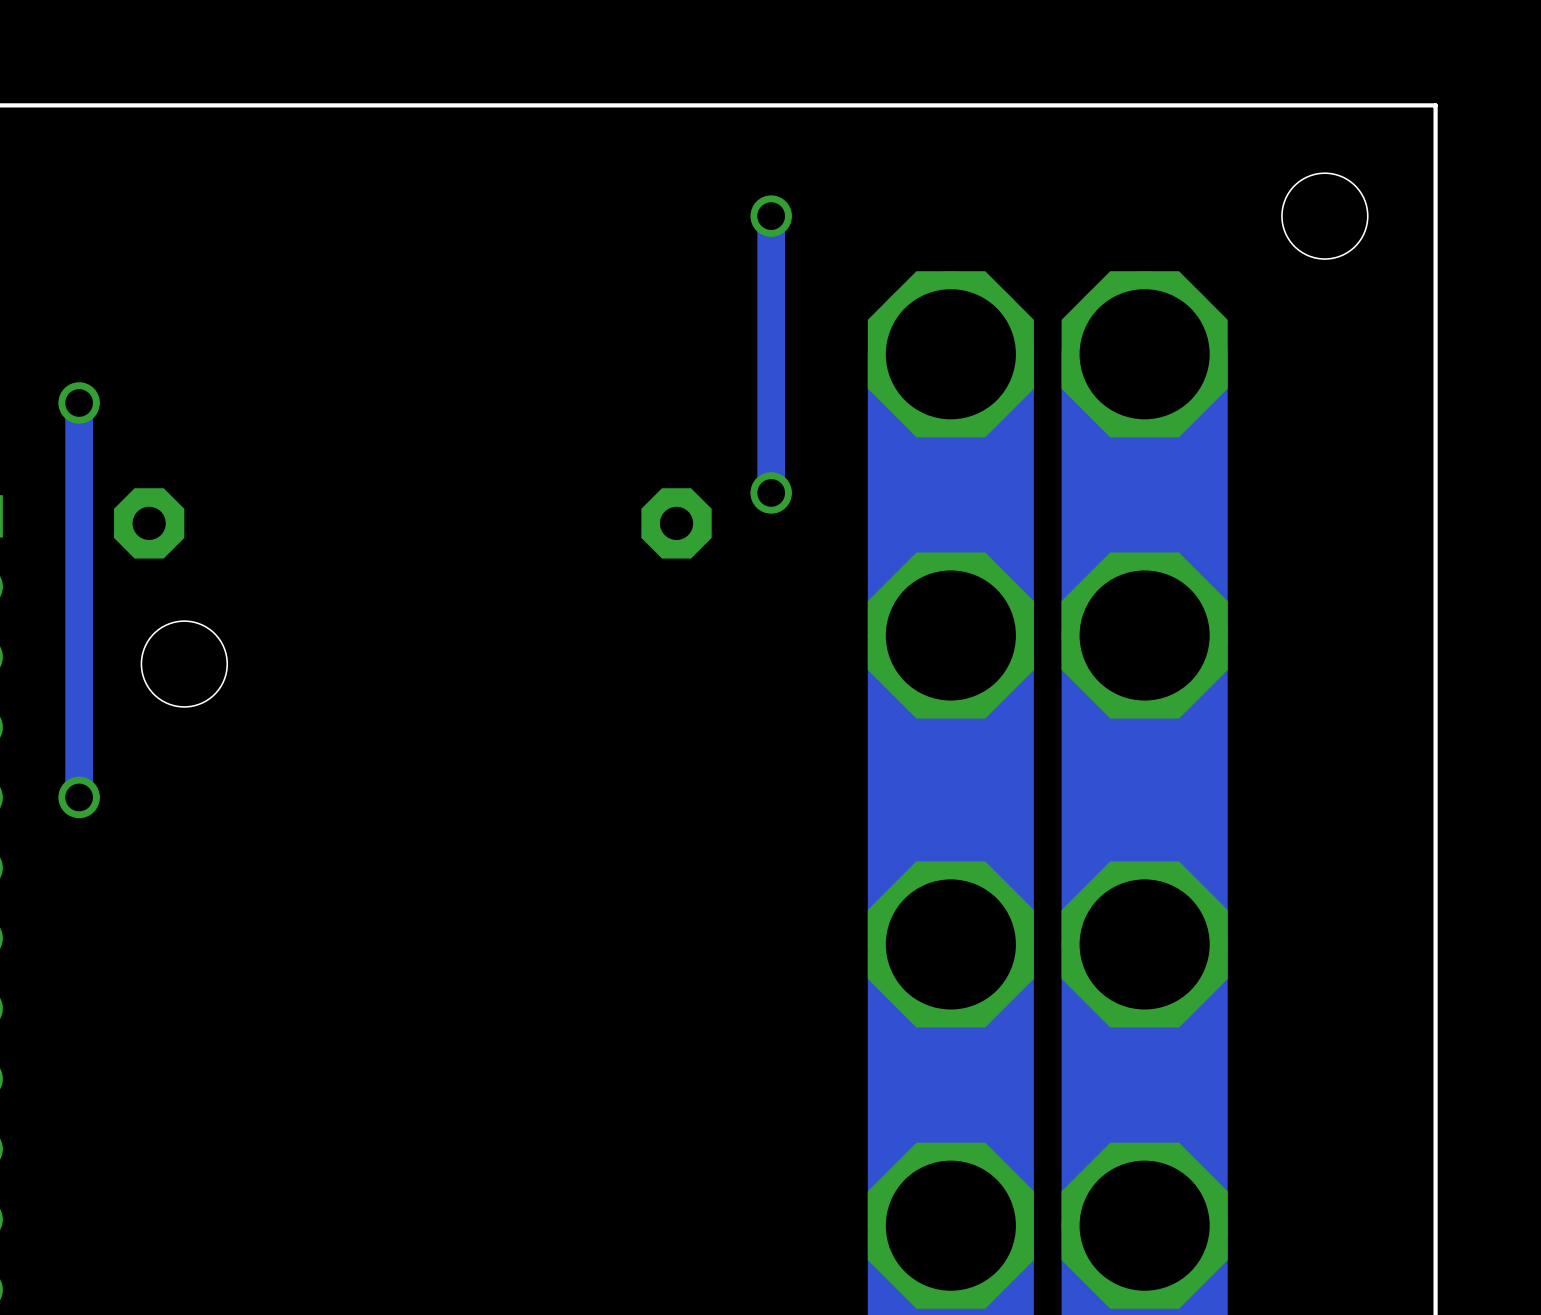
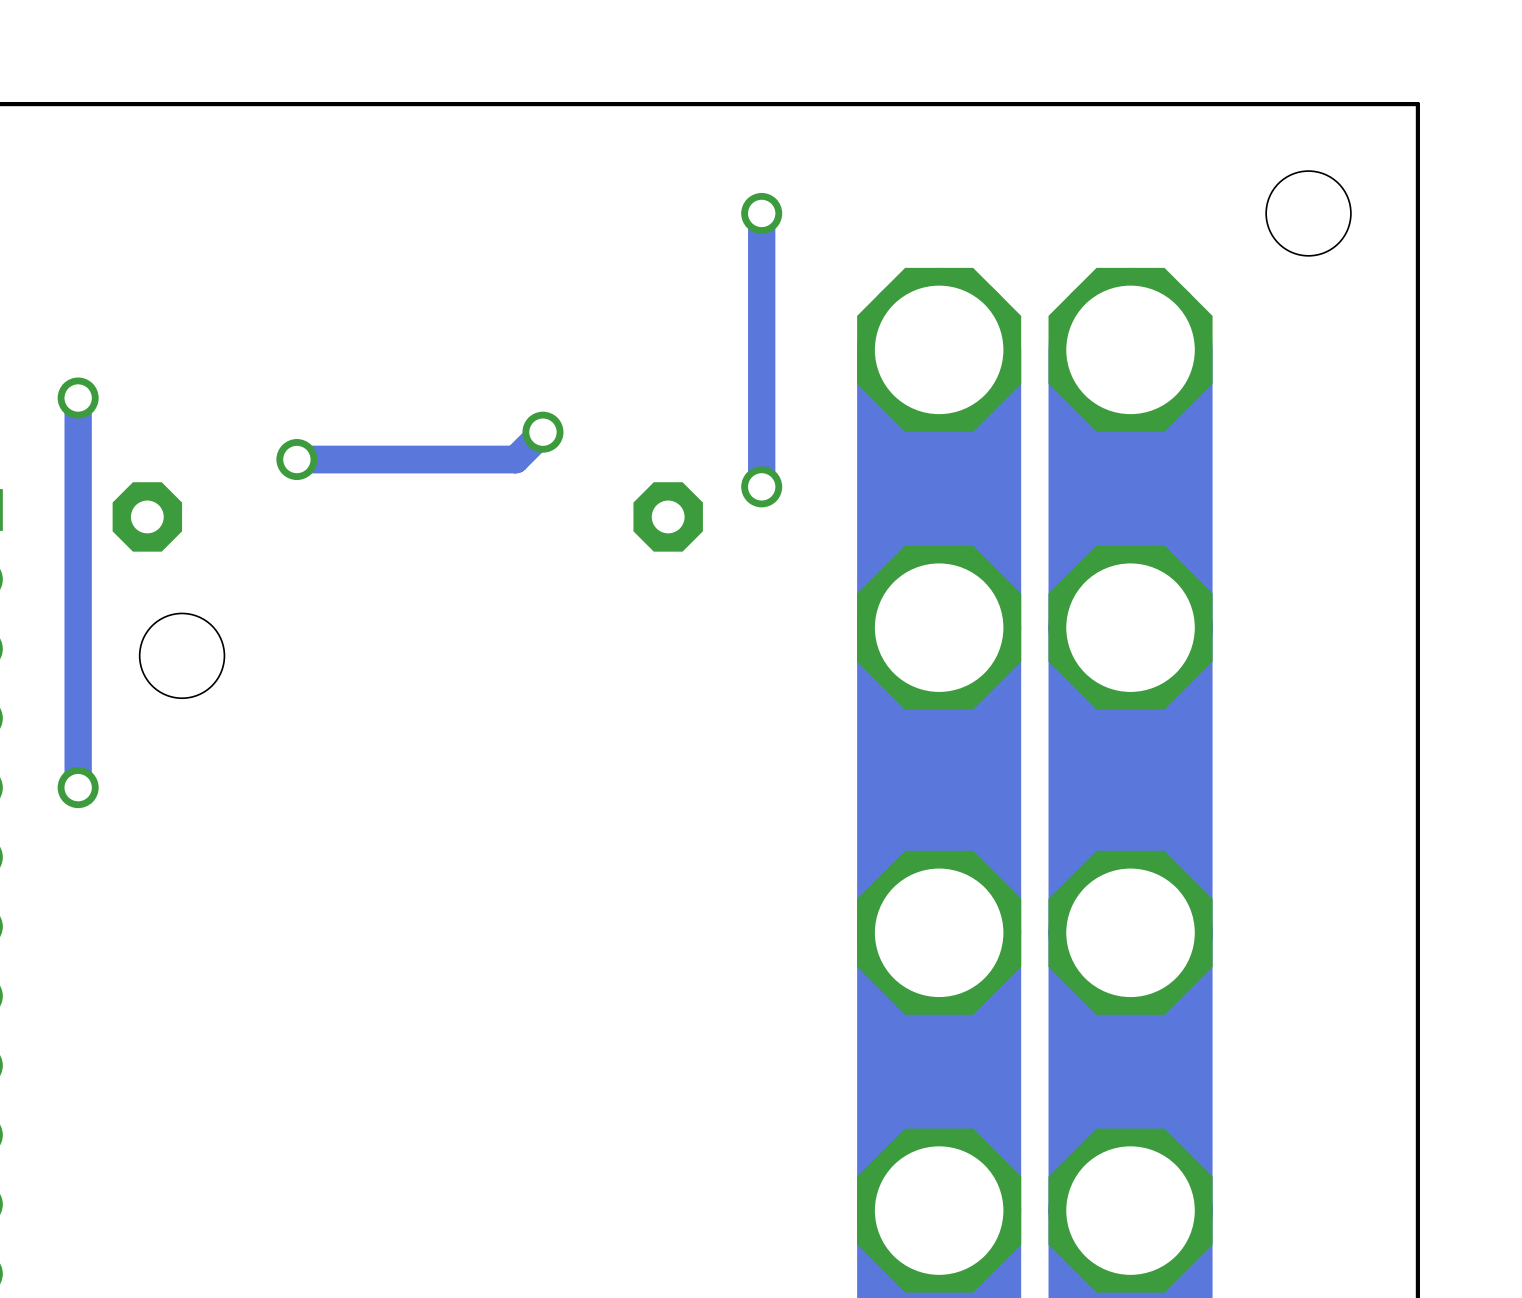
track: none -> (542, 432) (515, 459) (296, 459)
via: none -> (542, 432)
via: none -> (296, 459)

